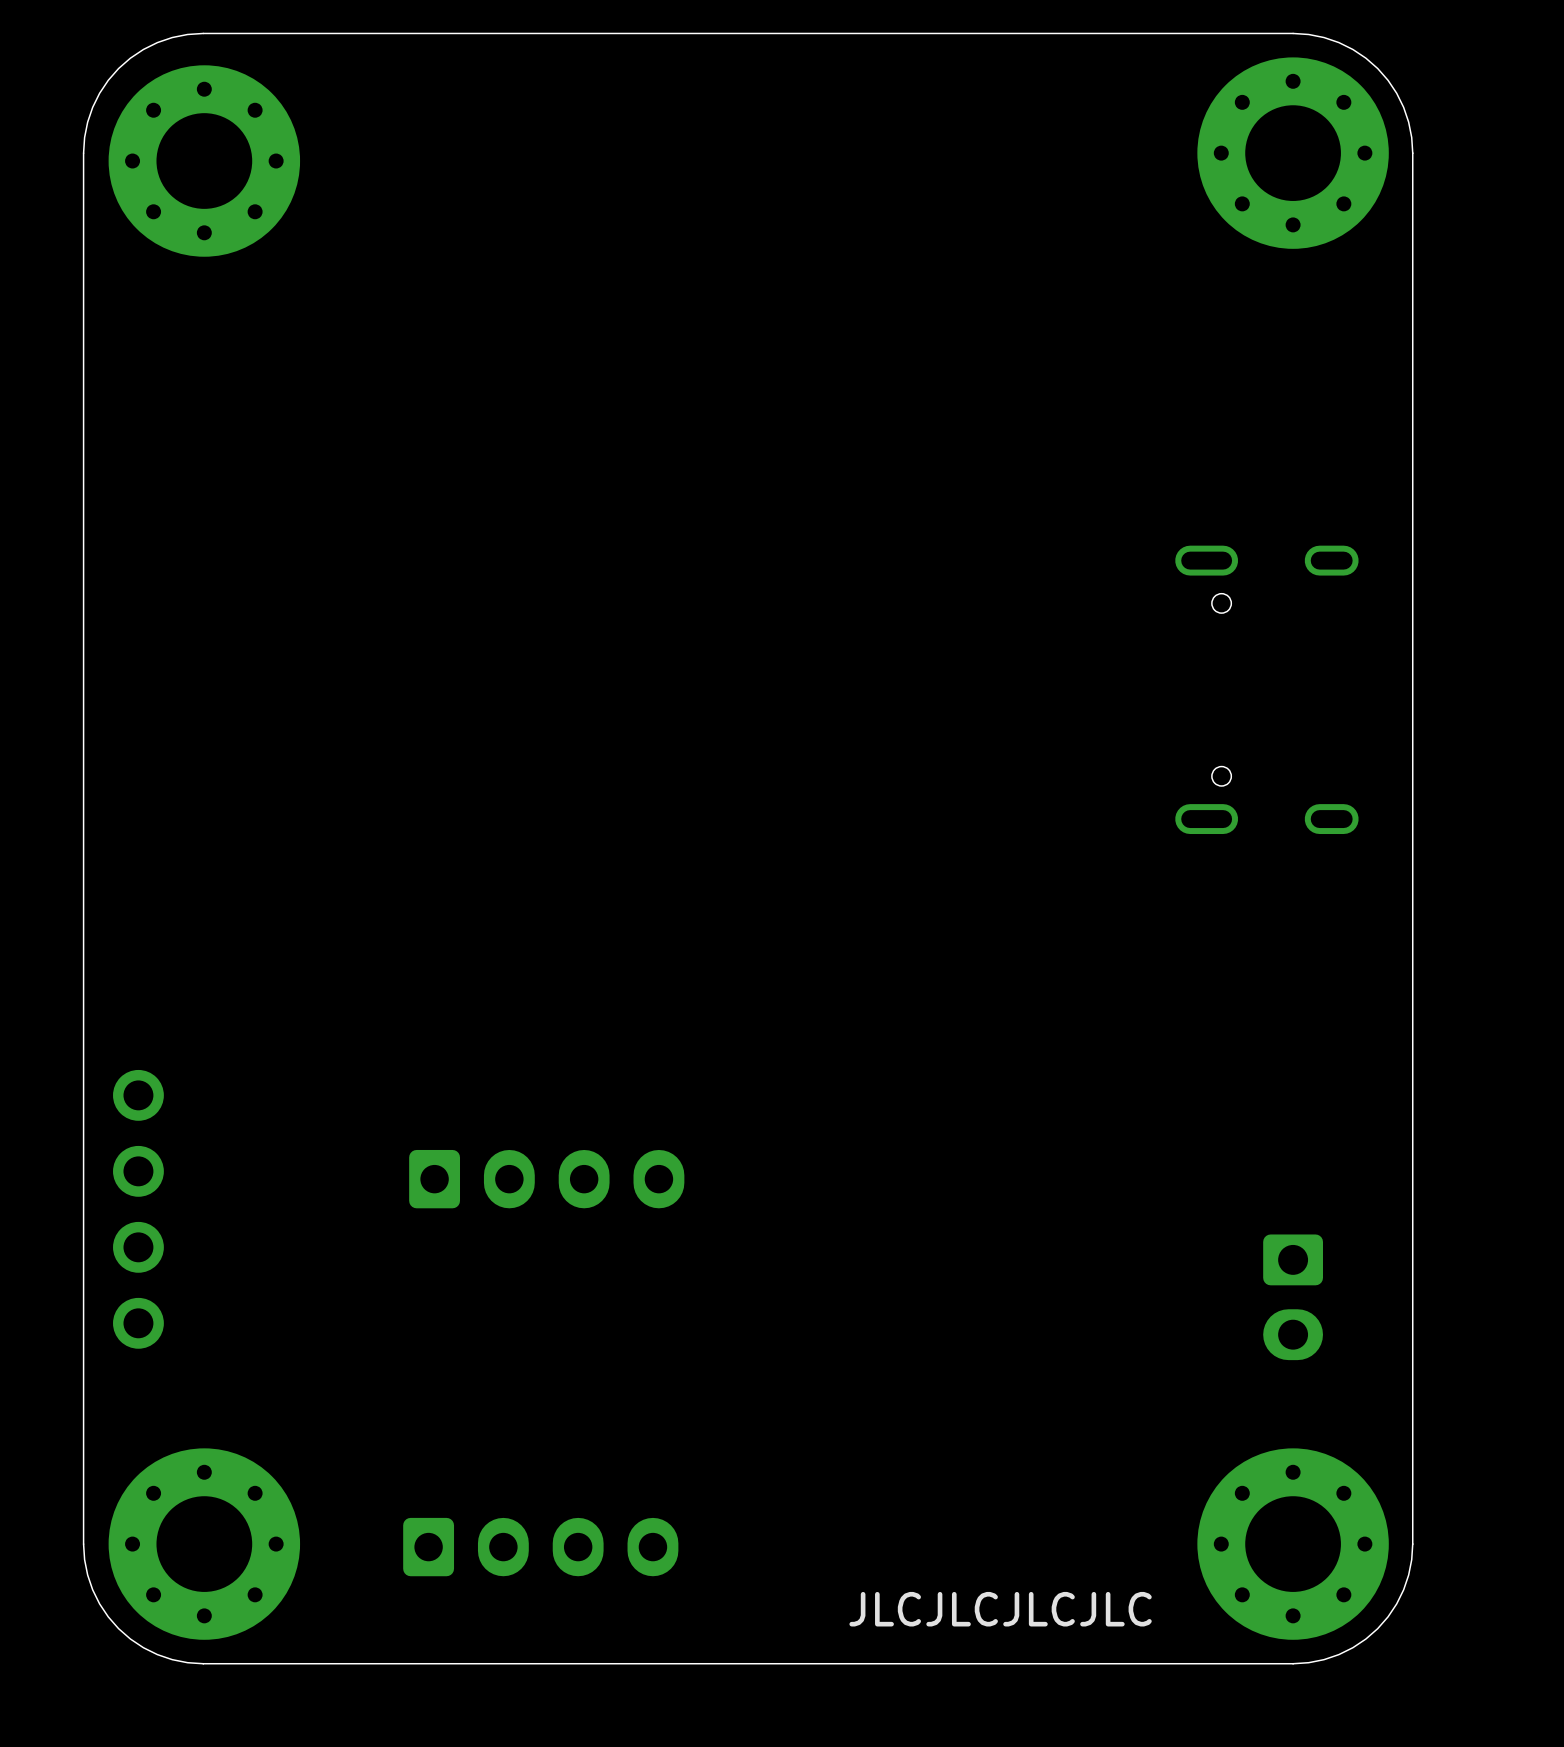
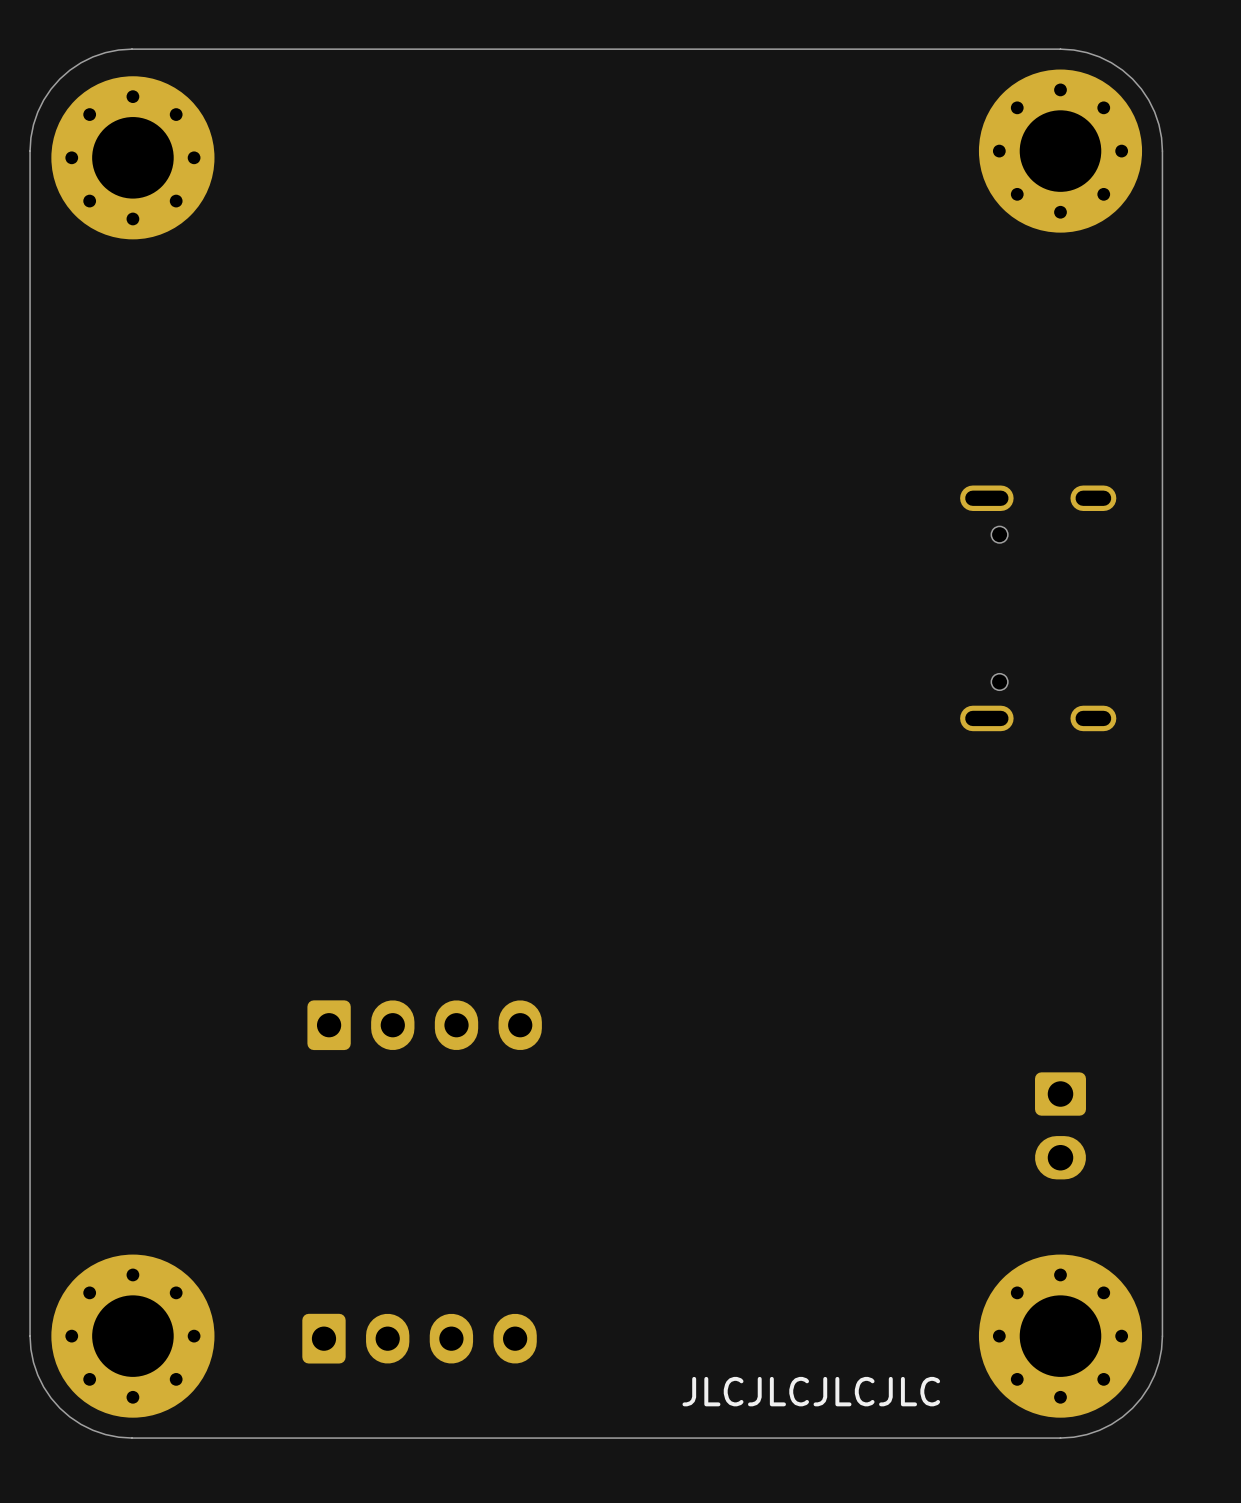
part: (138, 1209) -> none

